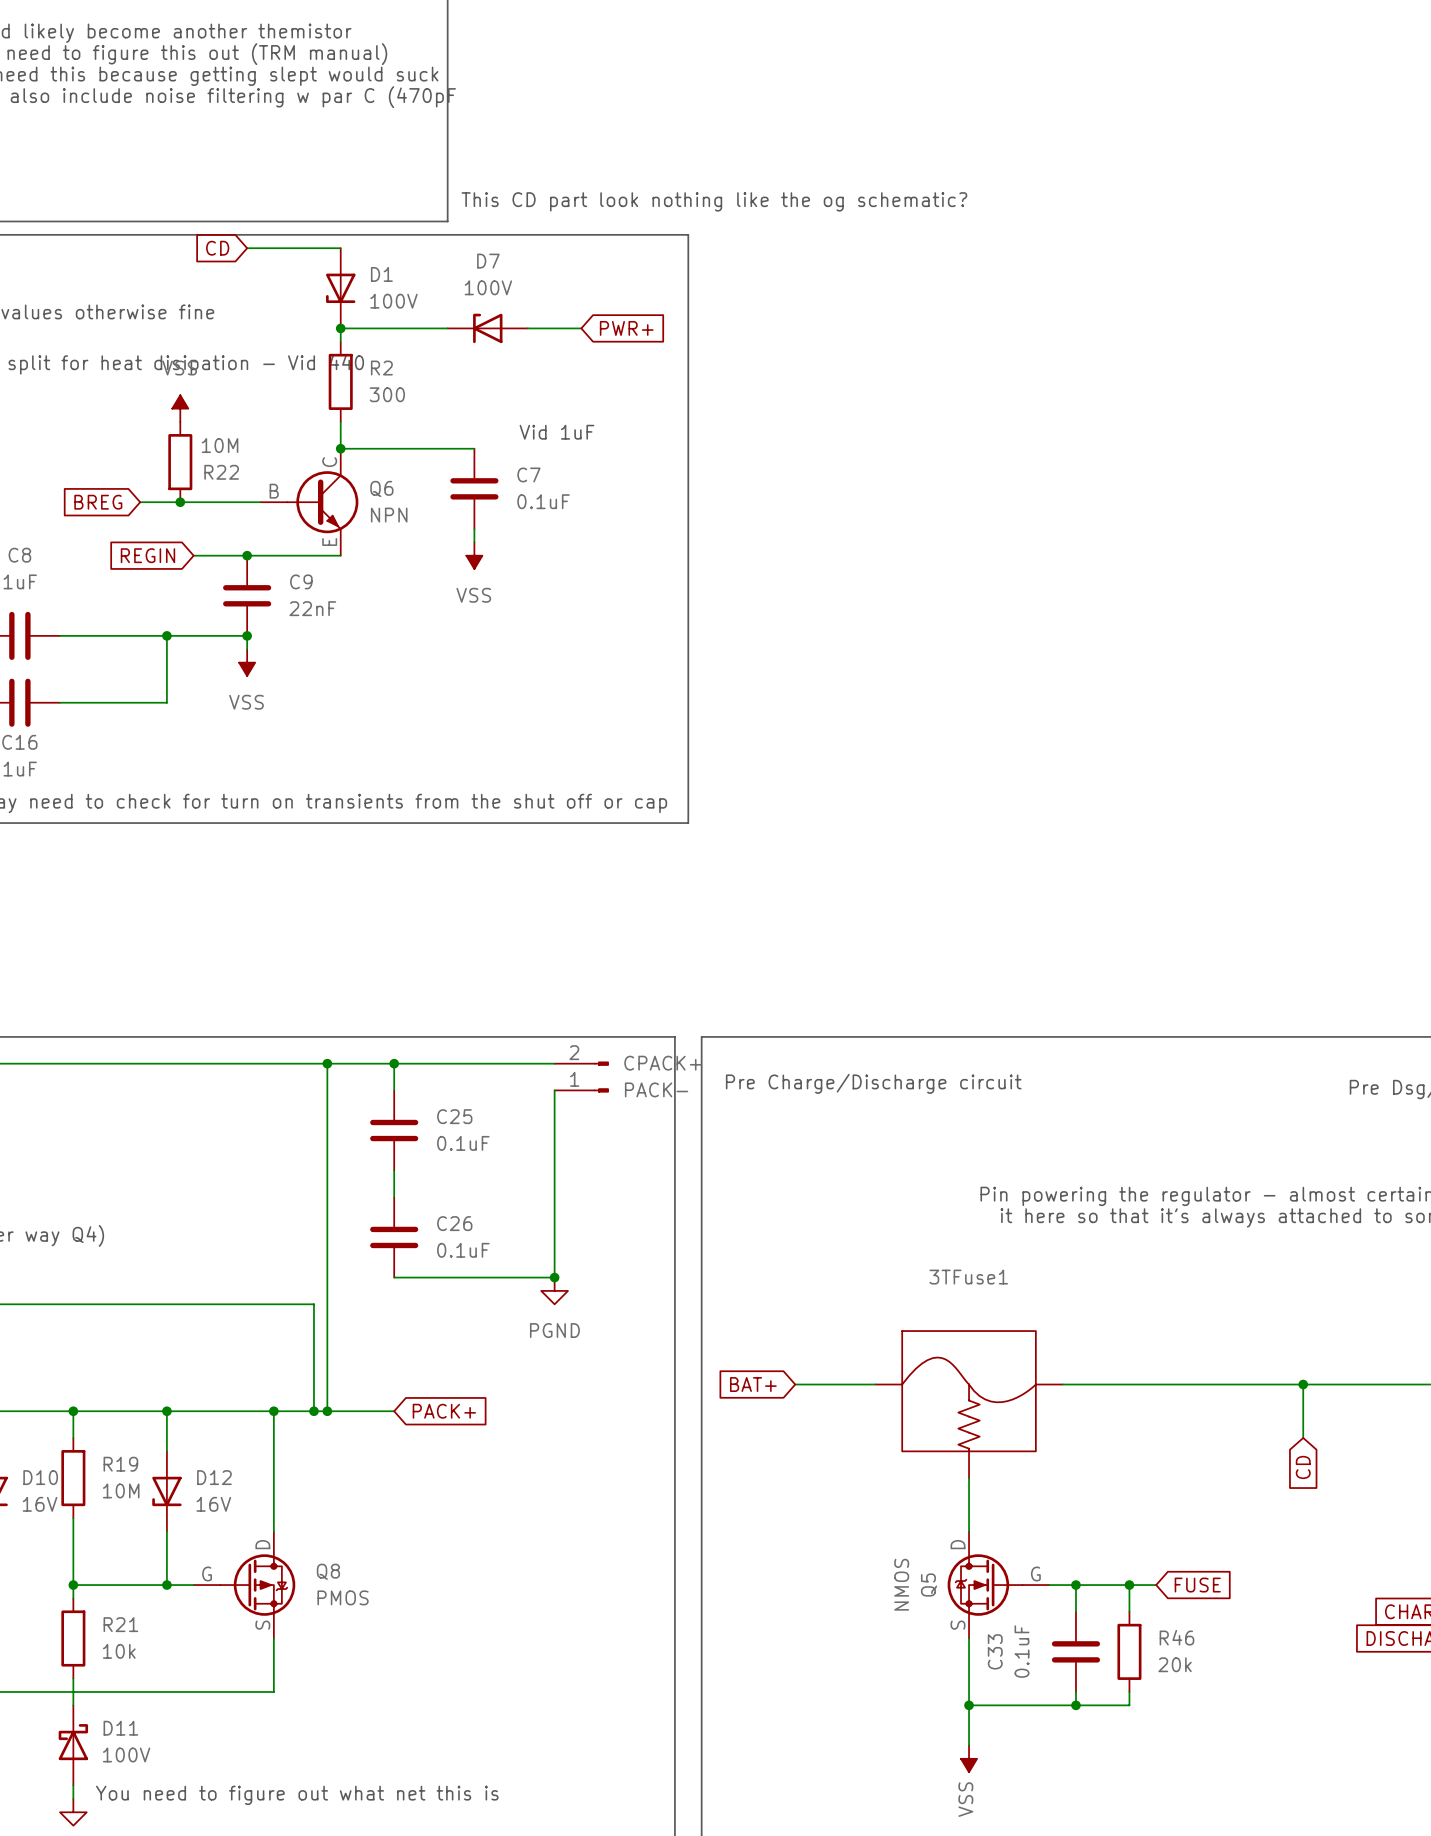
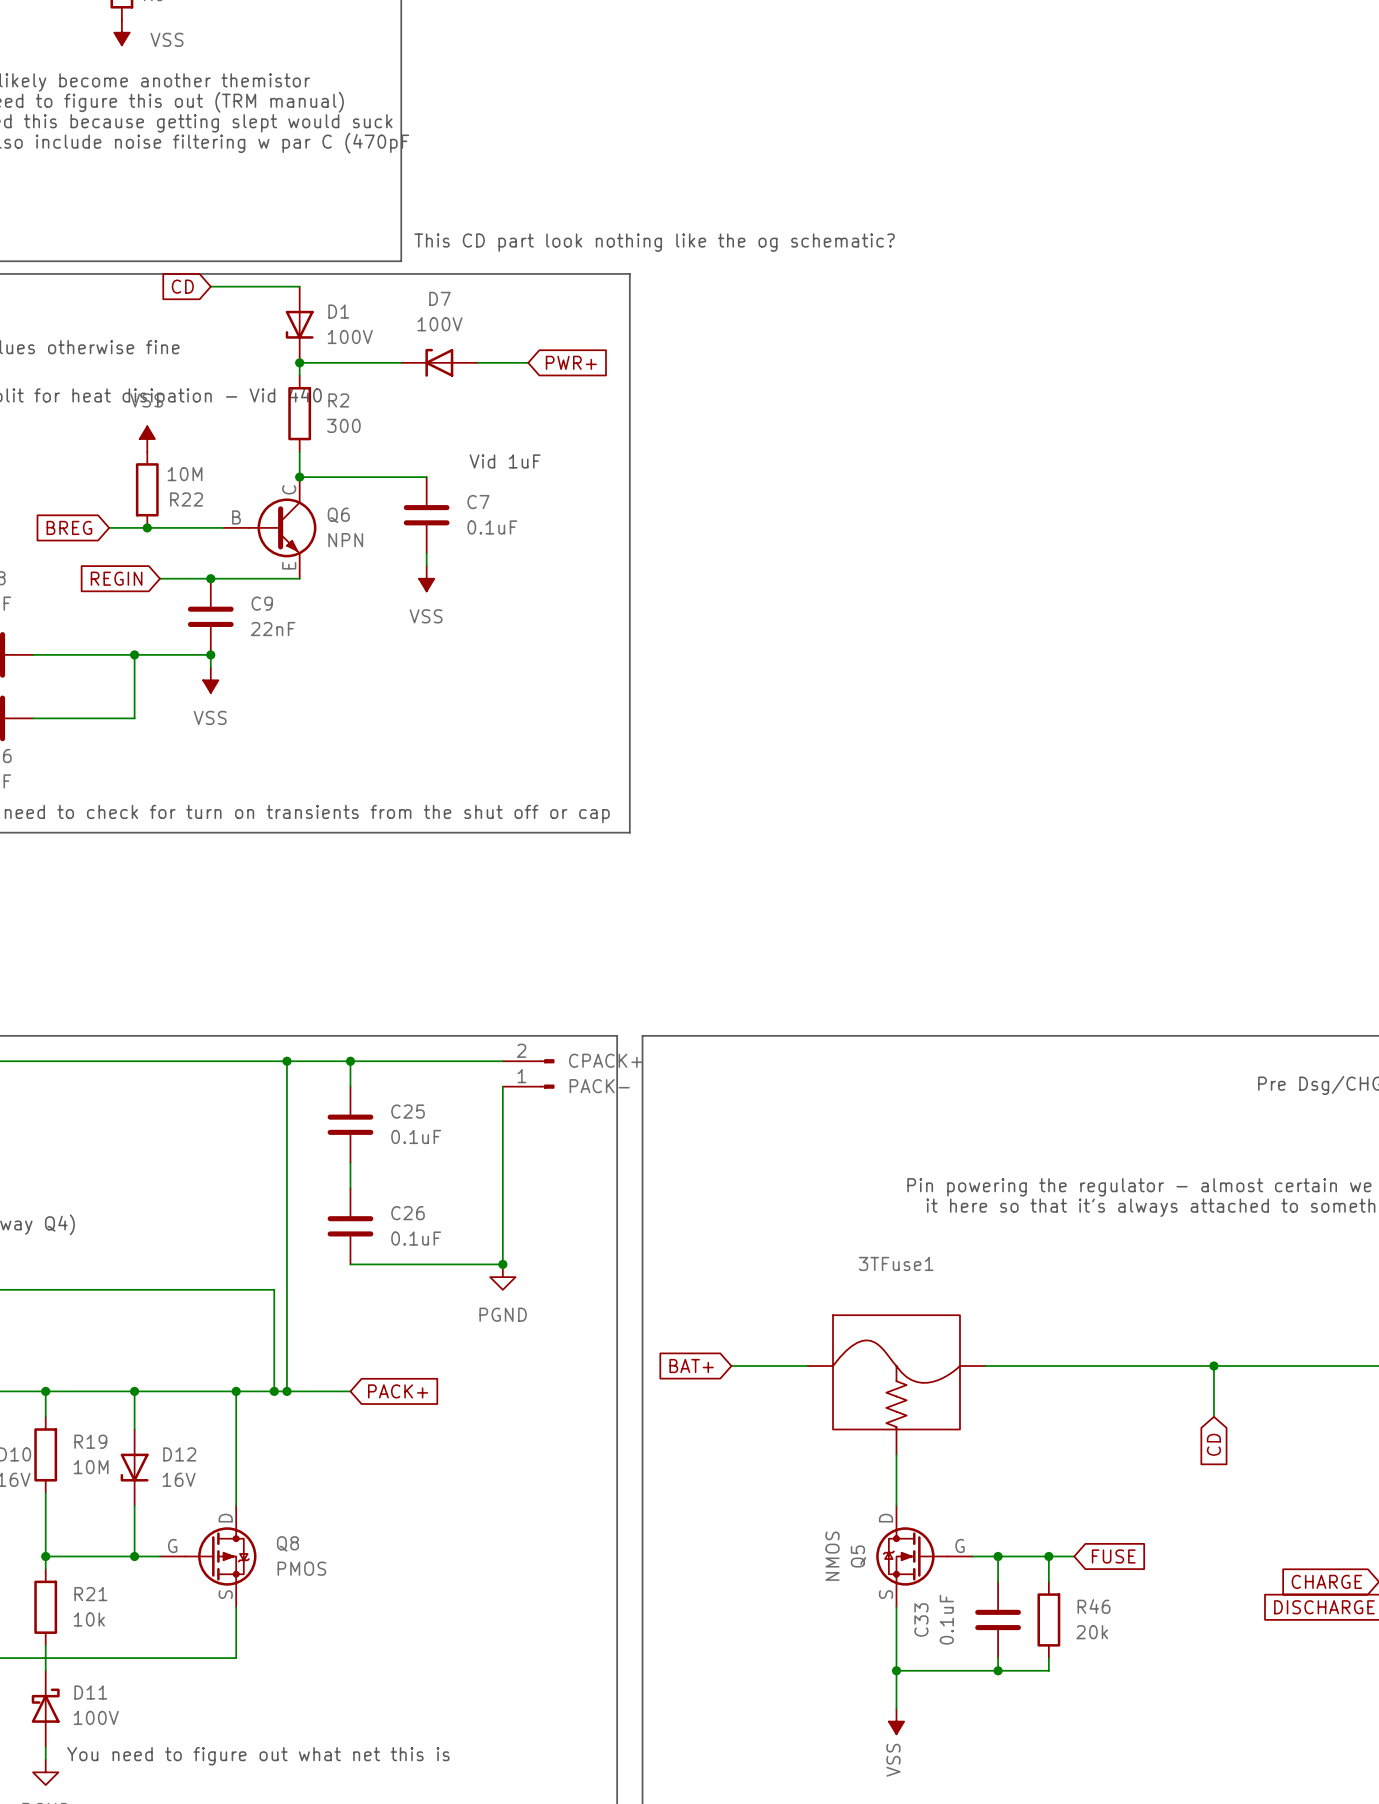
text: Pre Charge/Discharge circuit (873, 1083) -> none

